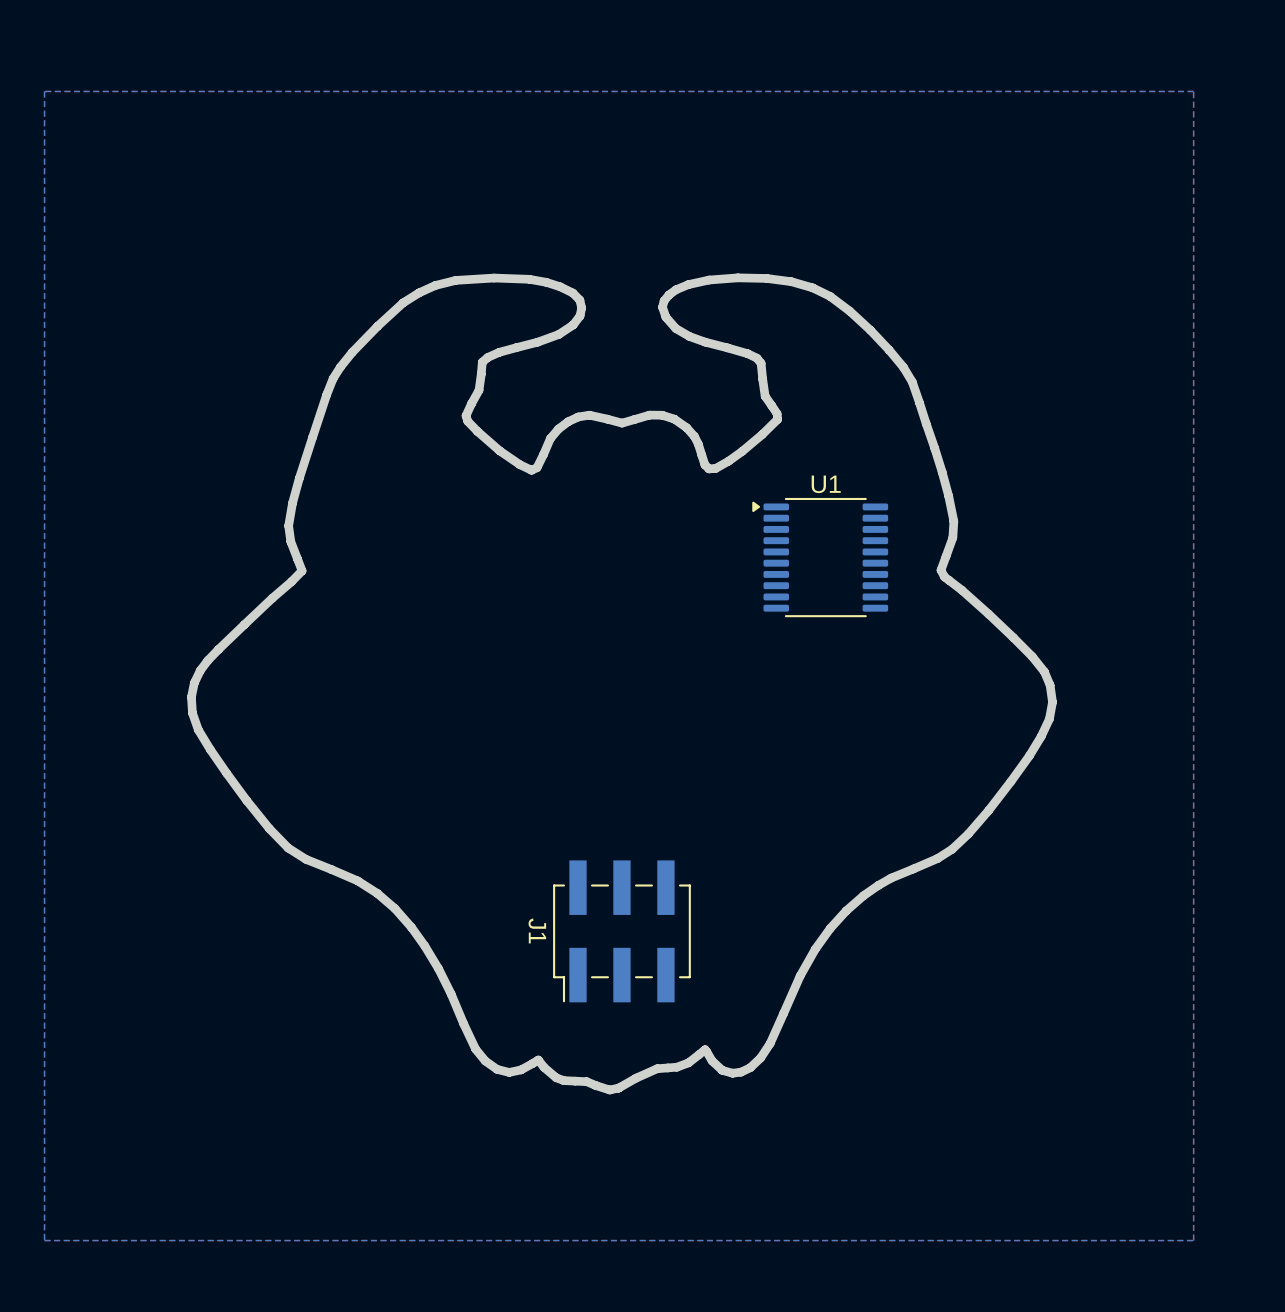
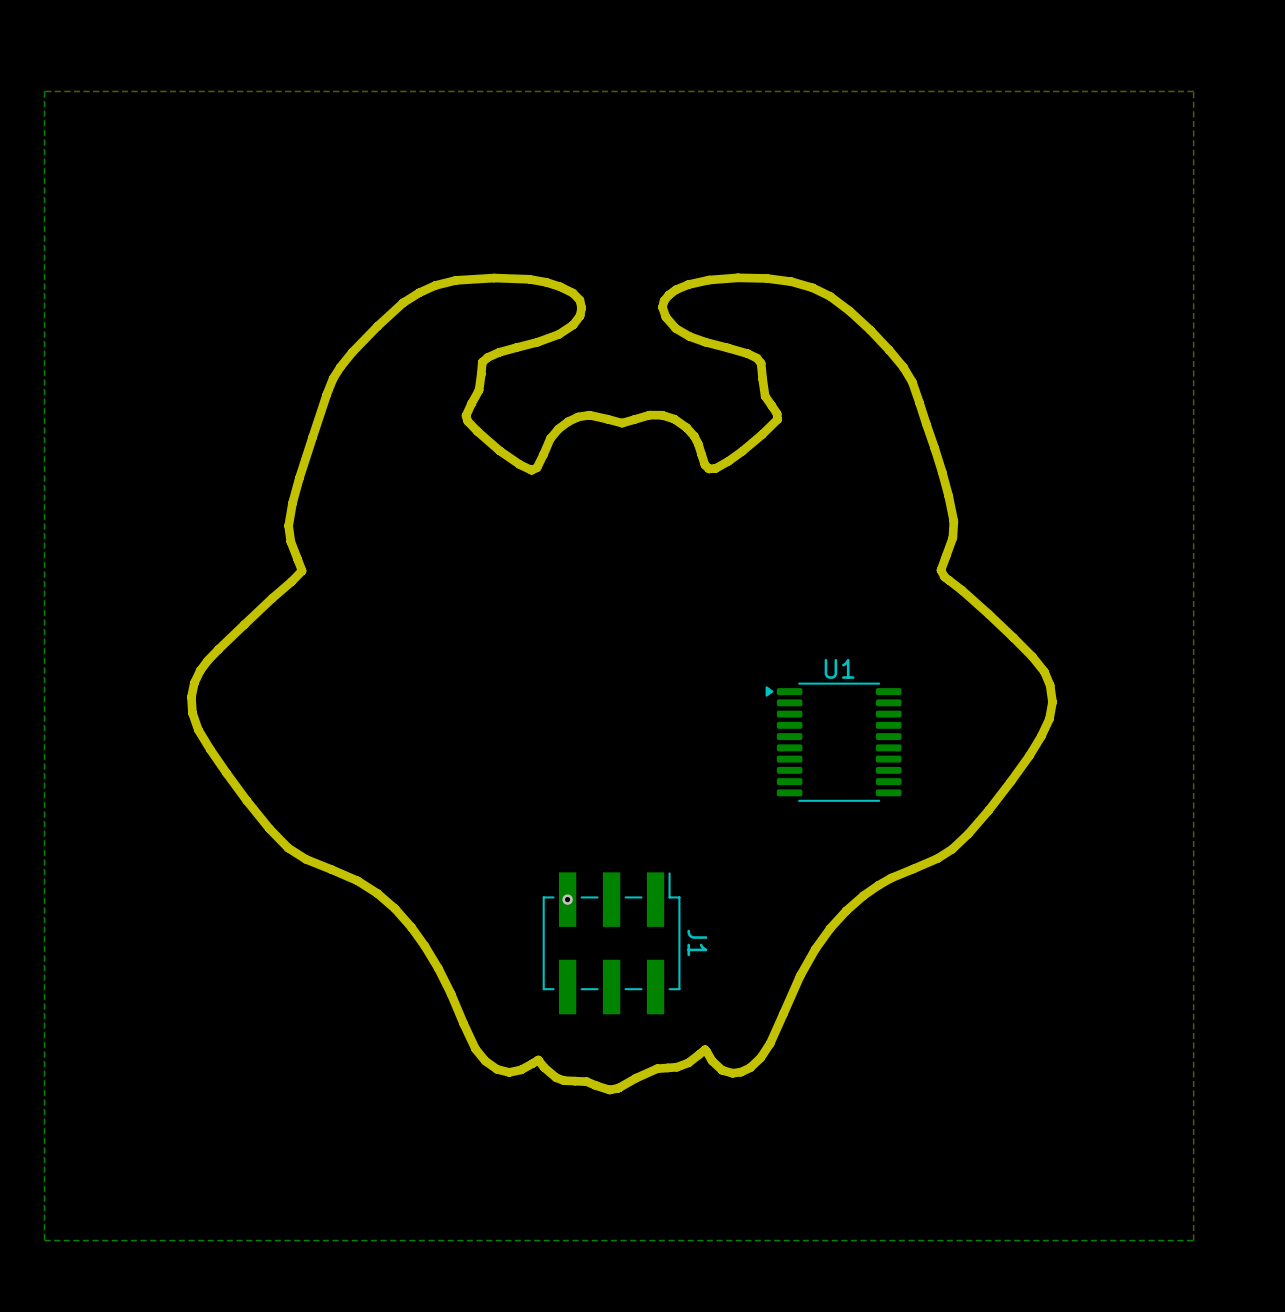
U1 position: (820, 557) -> (833, 742)
via: none -> (567, 899)
J1 rotation: 0° (621, 931) -> 180° (611, 943)

